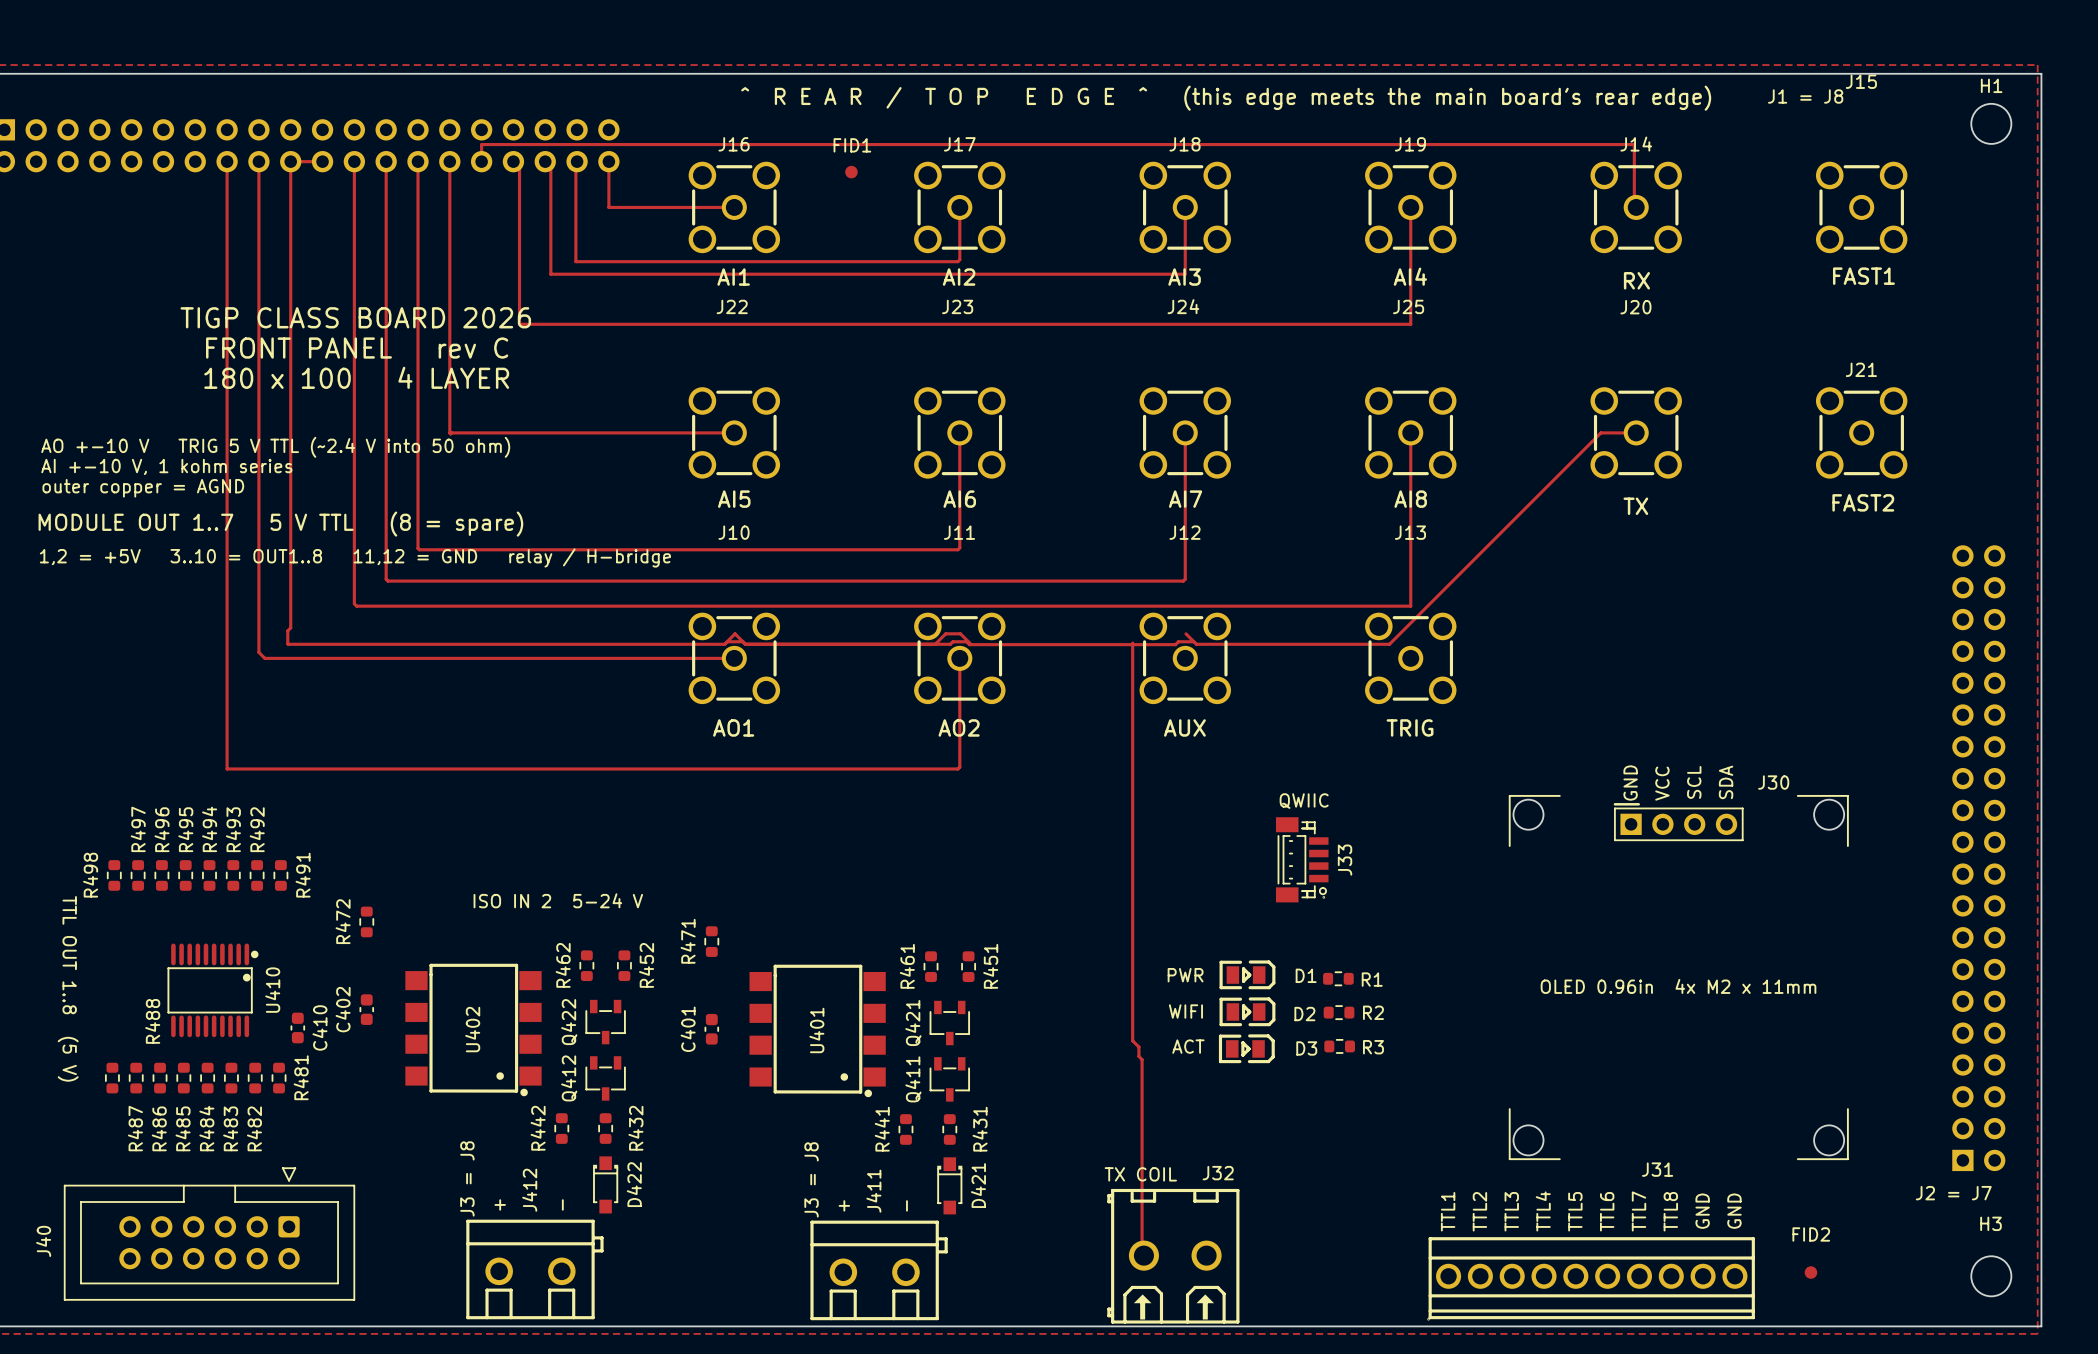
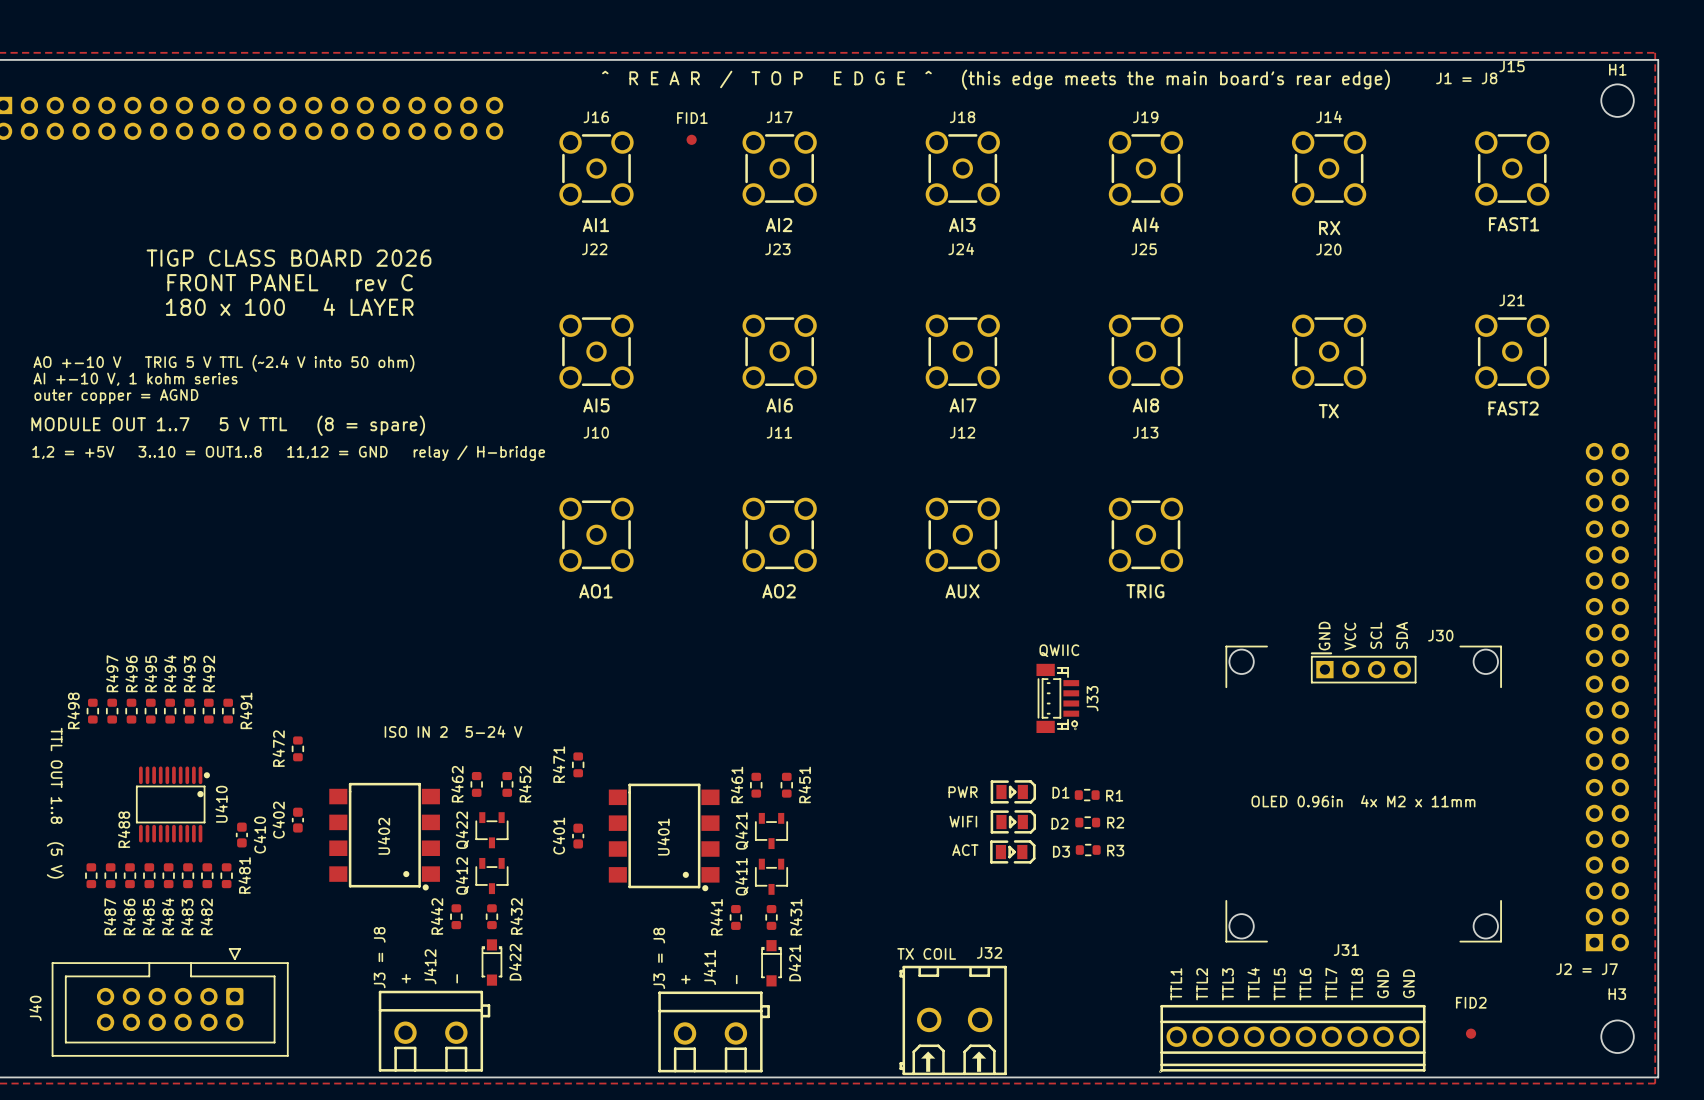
track: (227, 161) (227, 768) (957, 768) (959, 767) (959, 658) -> none
track: (258, 161) (258, 652) (264, 658) (734, 658) -> none
track: (322, 161) (290, 161) (290, 627) (287, 630) (288, 644) (724, 644) (735, 633) (745, 644) (950, 644) (952, 641) (966, 641) (969, 644) (1175, 644) (1178, 641) (1193, 641) -> none
track: (354, 161) (354, 603) (356, 606) (1410, 606) (1410, 432) -> none
track: (386, 161) (386, 579) (388, 581) (1183, 581) (1185, 579) (1185, 432) -> none
track: (418, 161) (419, 549) (957, 549) (959, 547) (959, 432) -> none
track: (449, 161) (450, 433) (734, 432) -> none
track: (481, 161) (481, 144) (1634, 144) (1634, 205) (1636, 207) -> none
track: (513, 161) (519, 167) (519, 324) (1410, 324) (1410, 207) (1415, 211) -> none
track: (545, 161) (550, 167) (550, 274) (1185, 274) (1185, 207) -> none
track: (577, 161) (575, 261) (957, 261) (959, 259) (959, 207) -> none
track: (608, 161) (608, 207) (734, 207) -> none
track: (1636, 432) (1600, 432) (1389, 644) (1196, 644) (1185, 633) -> none
track: (742, 641) (727, 641) (724, 644) -> none
track: (1132, 643) (1132, 1040) (1138, 1047) (1138, 1056) (1142, 1059) (1142, 1241) -> none
track: (935, 644) (945, 633) (960, 633) (970, 644) -> none

